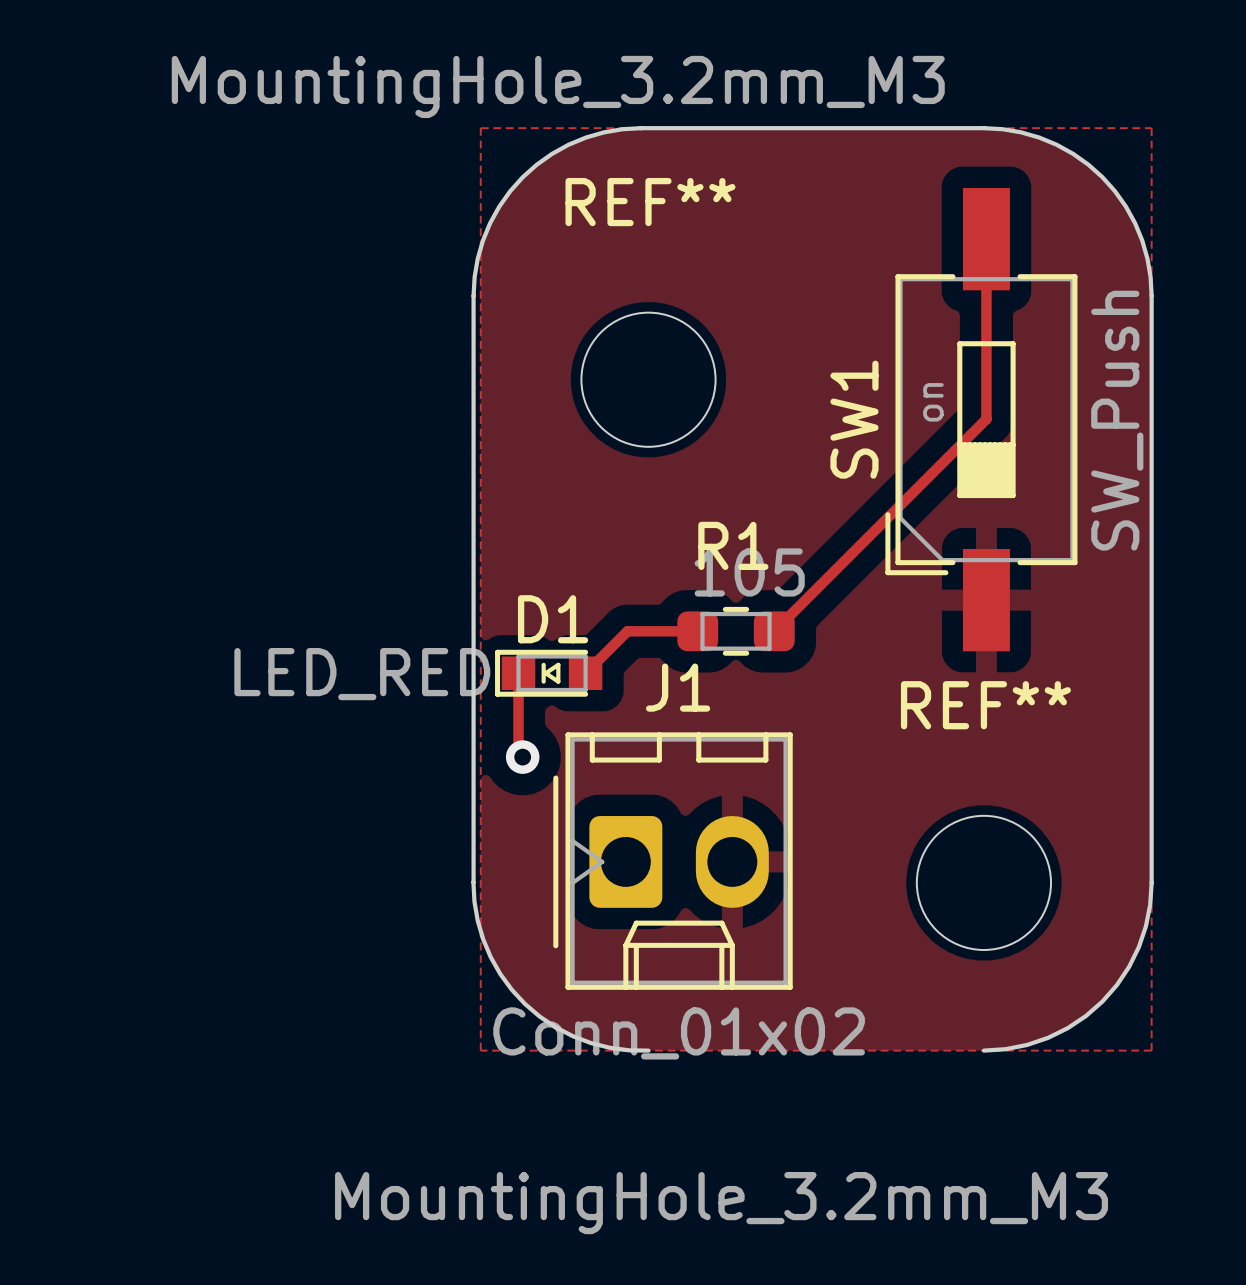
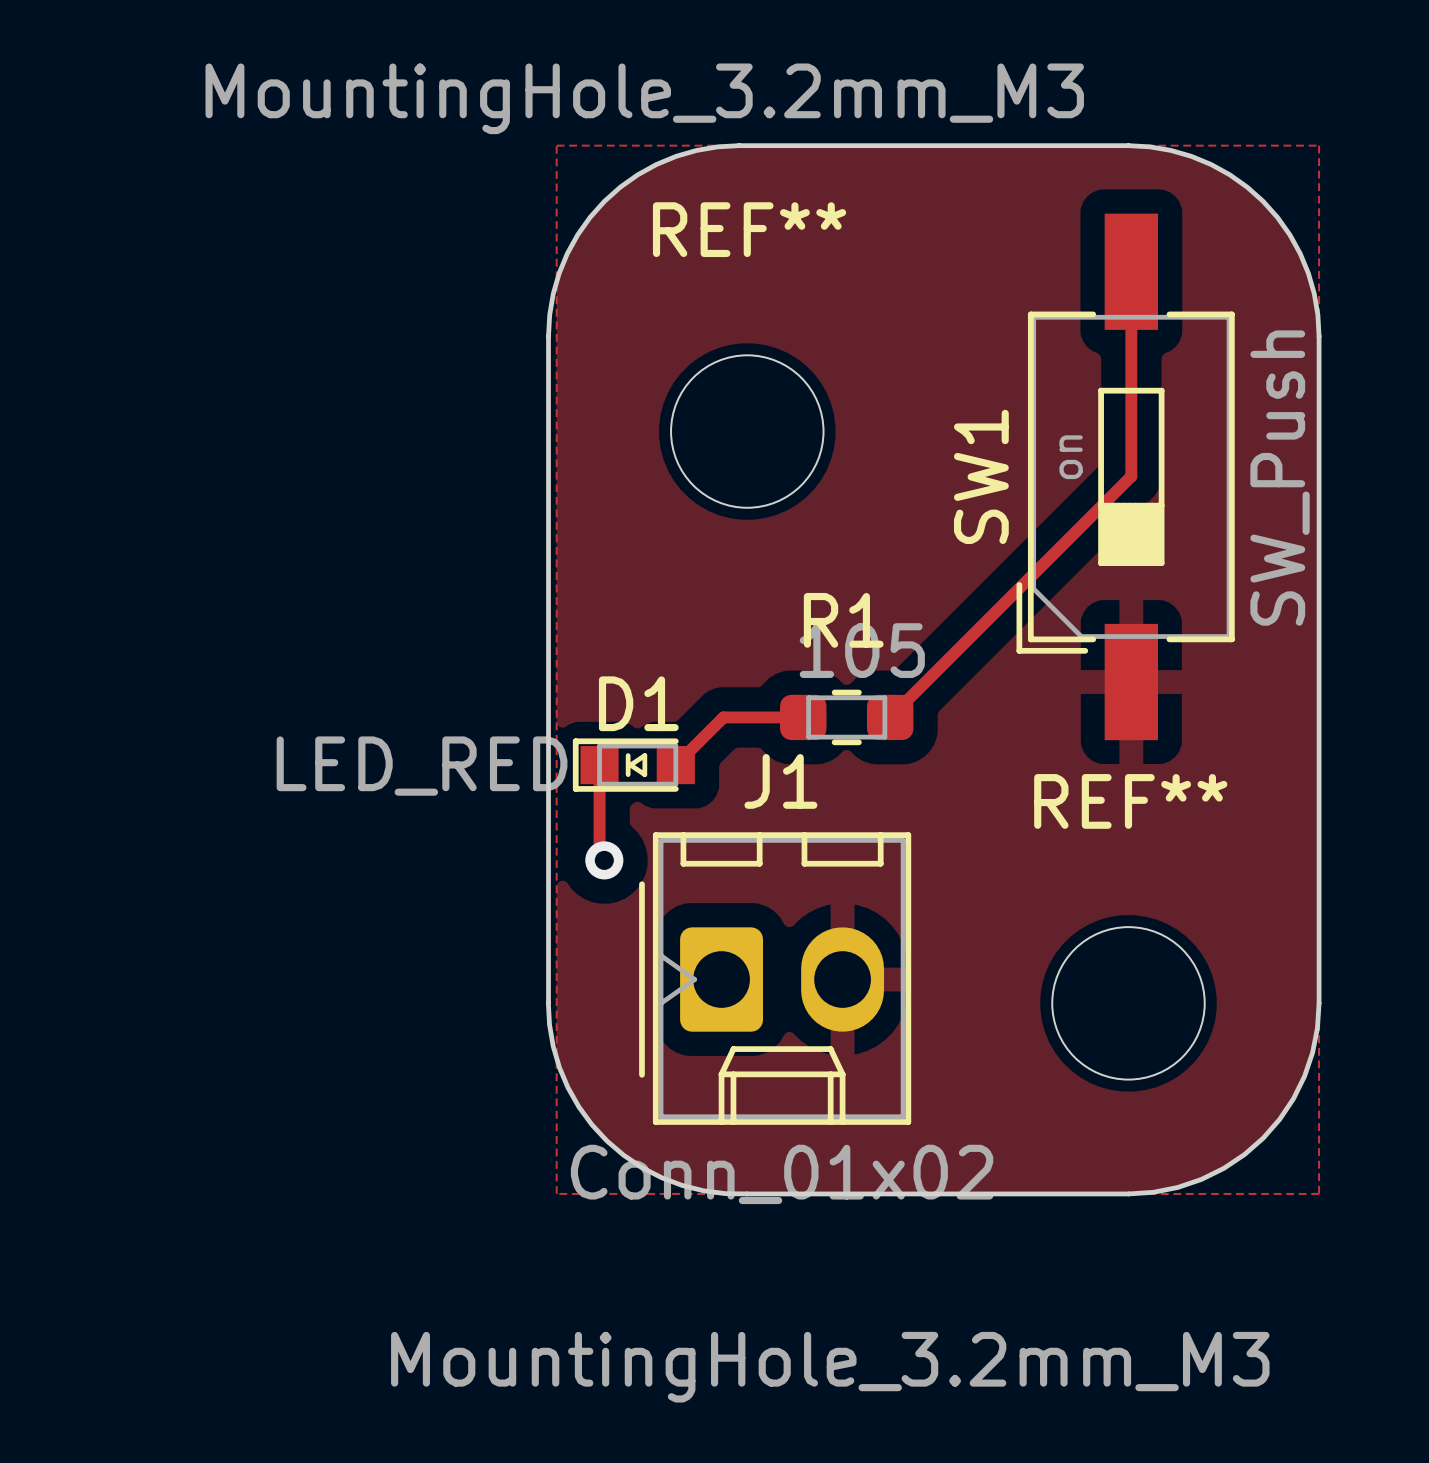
board edge: none -> (747, 1193) (1128, 1193)

